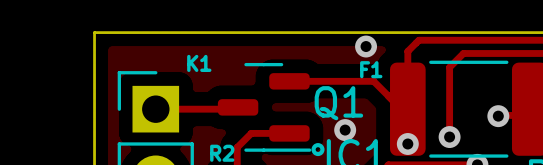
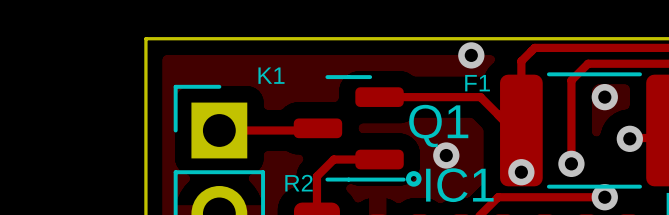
via: none -> (604, 97)

